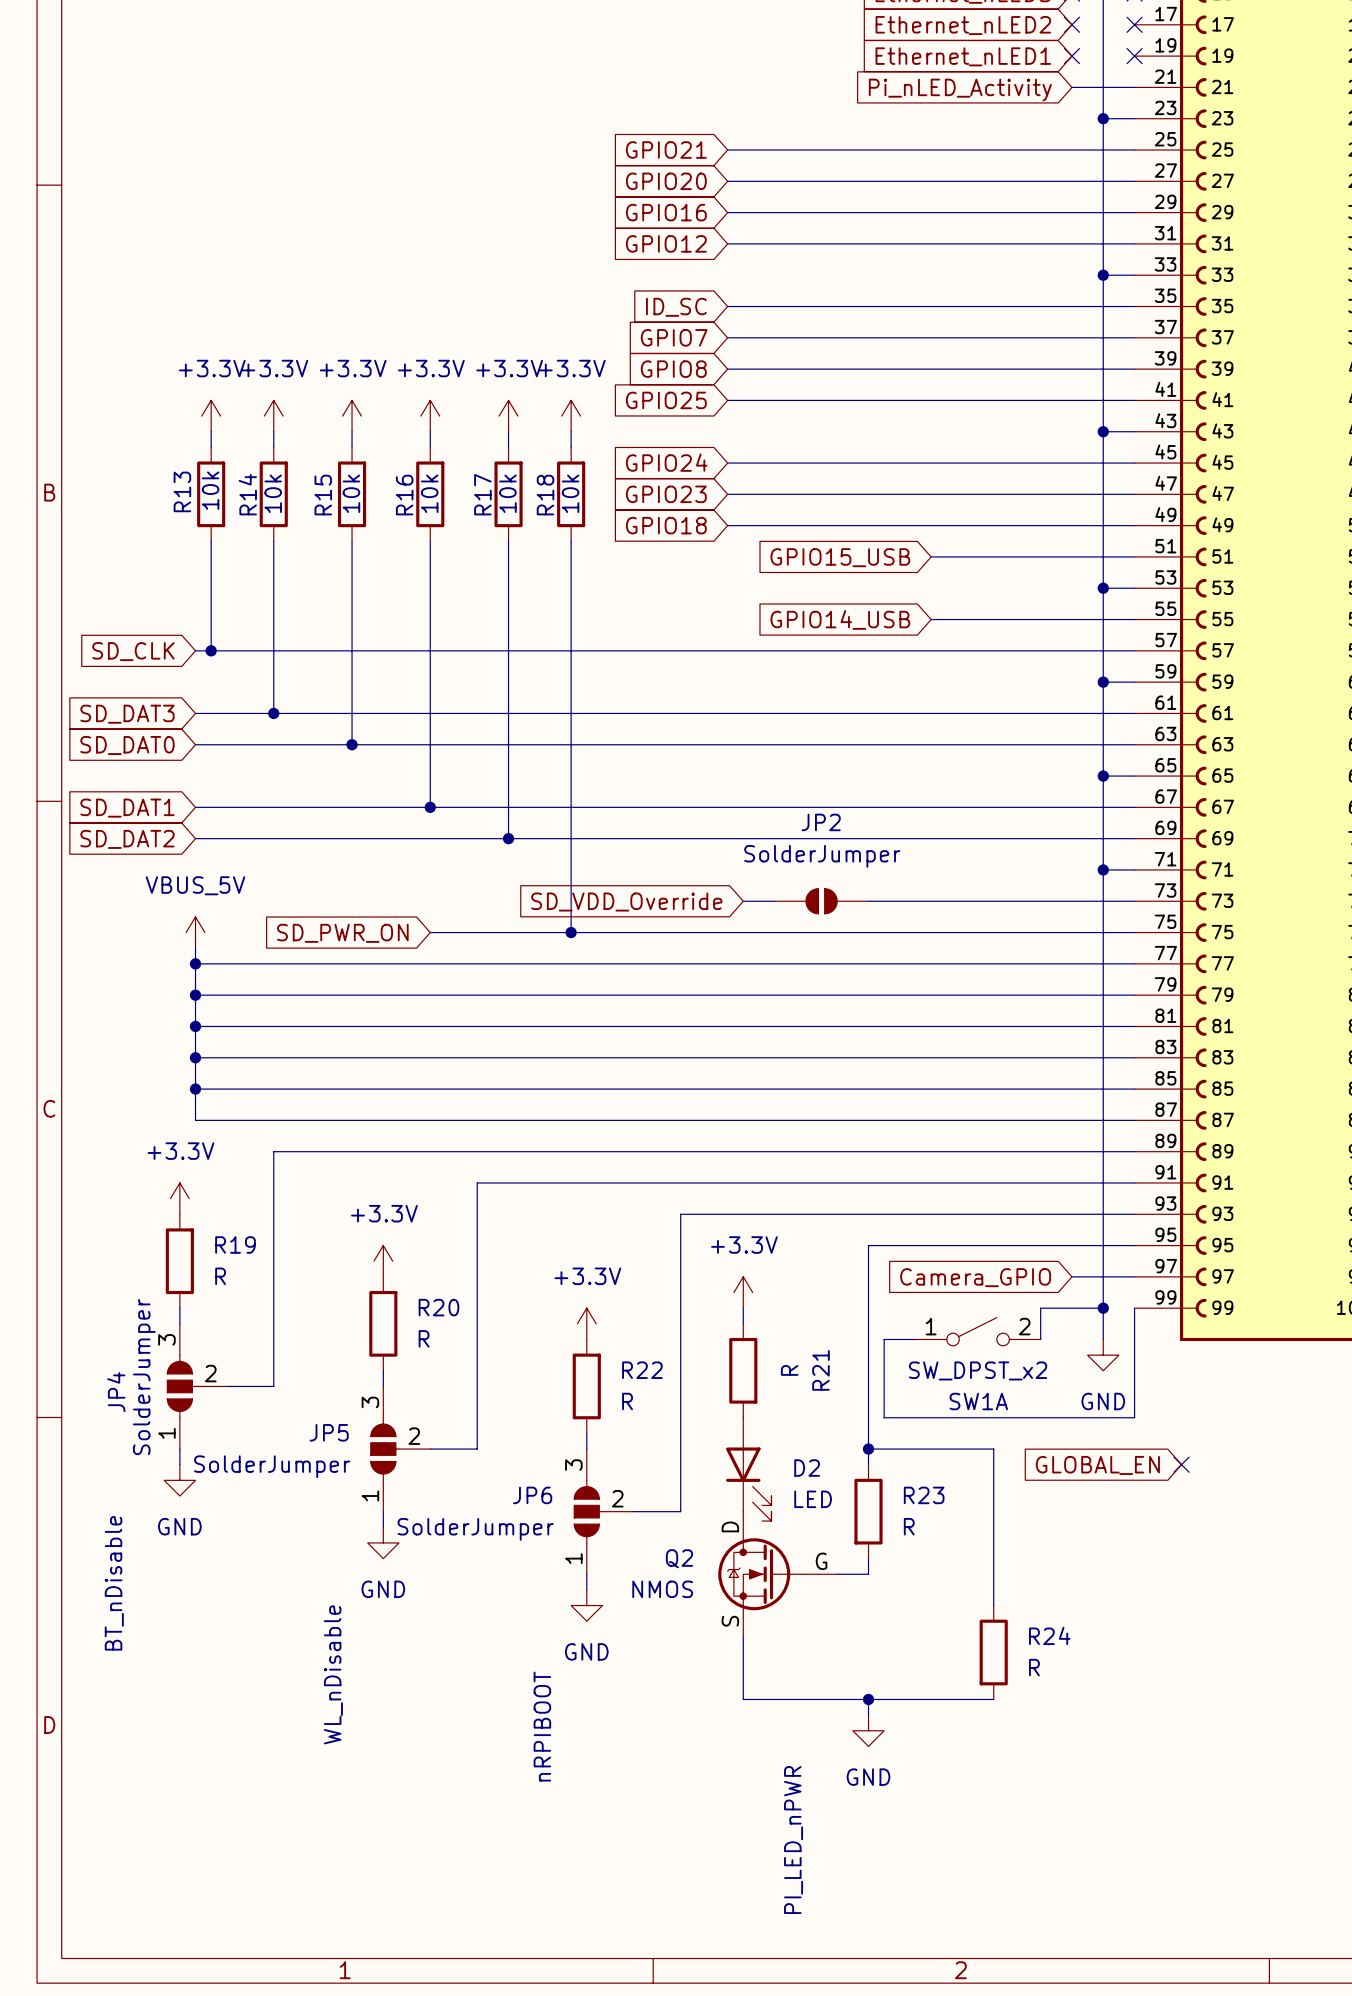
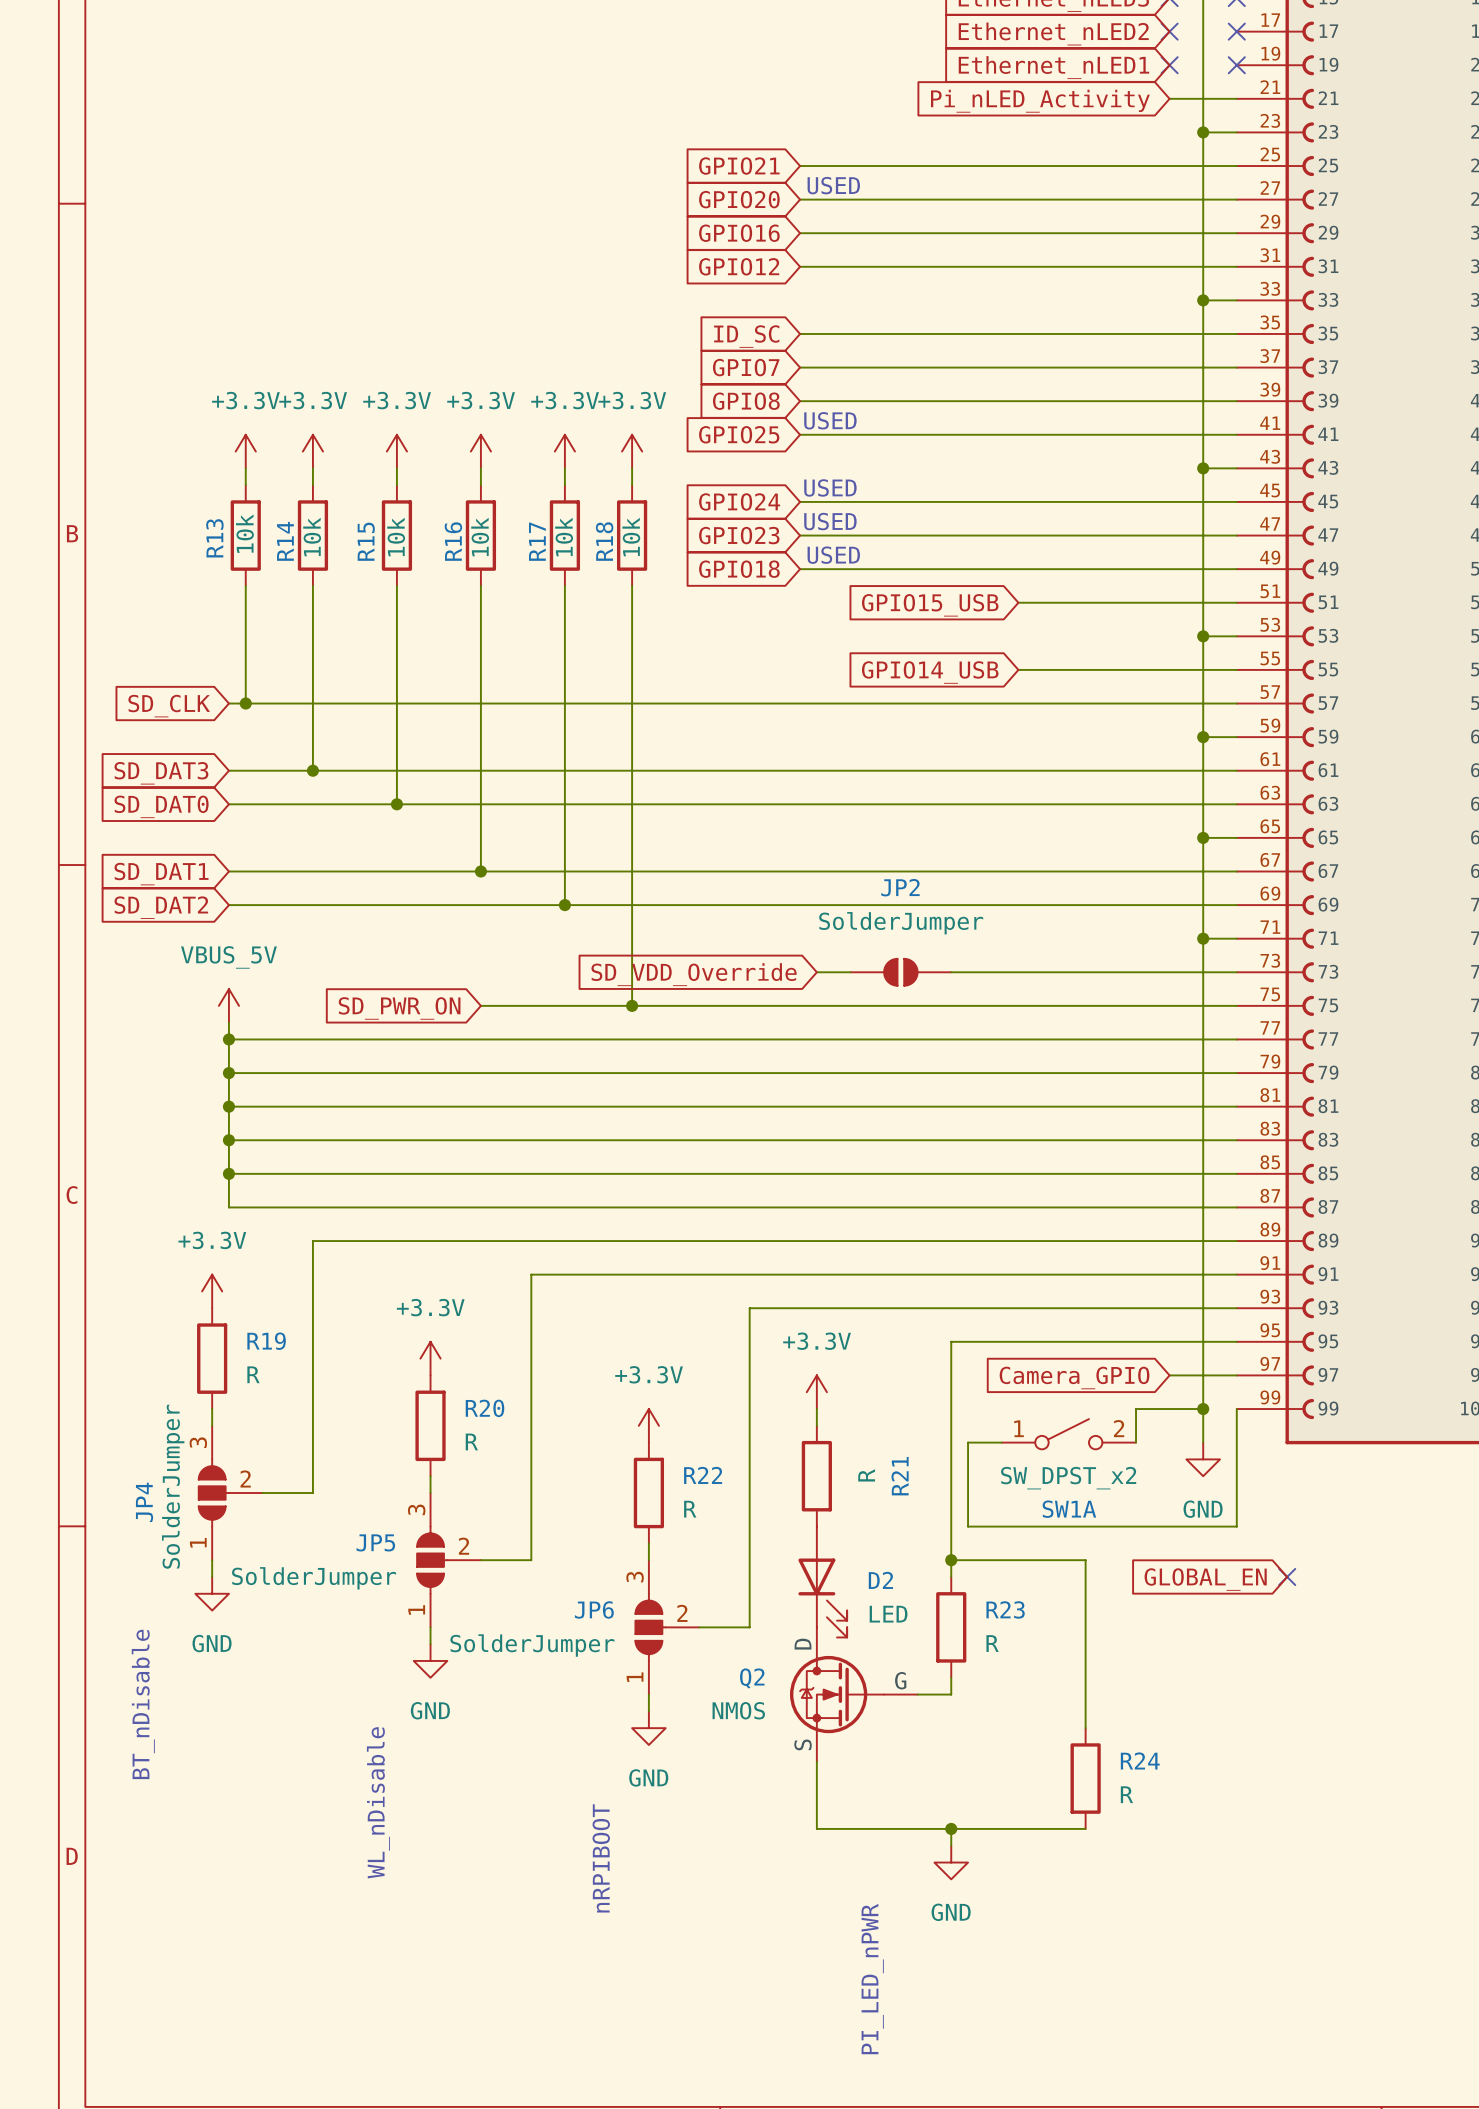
text: none -> USED (833, 185)
text: none -> USED (830, 420)
text: none -> USED (830, 487)
text: none -> USED (830, 521)
text: none -> USED (833, 555)

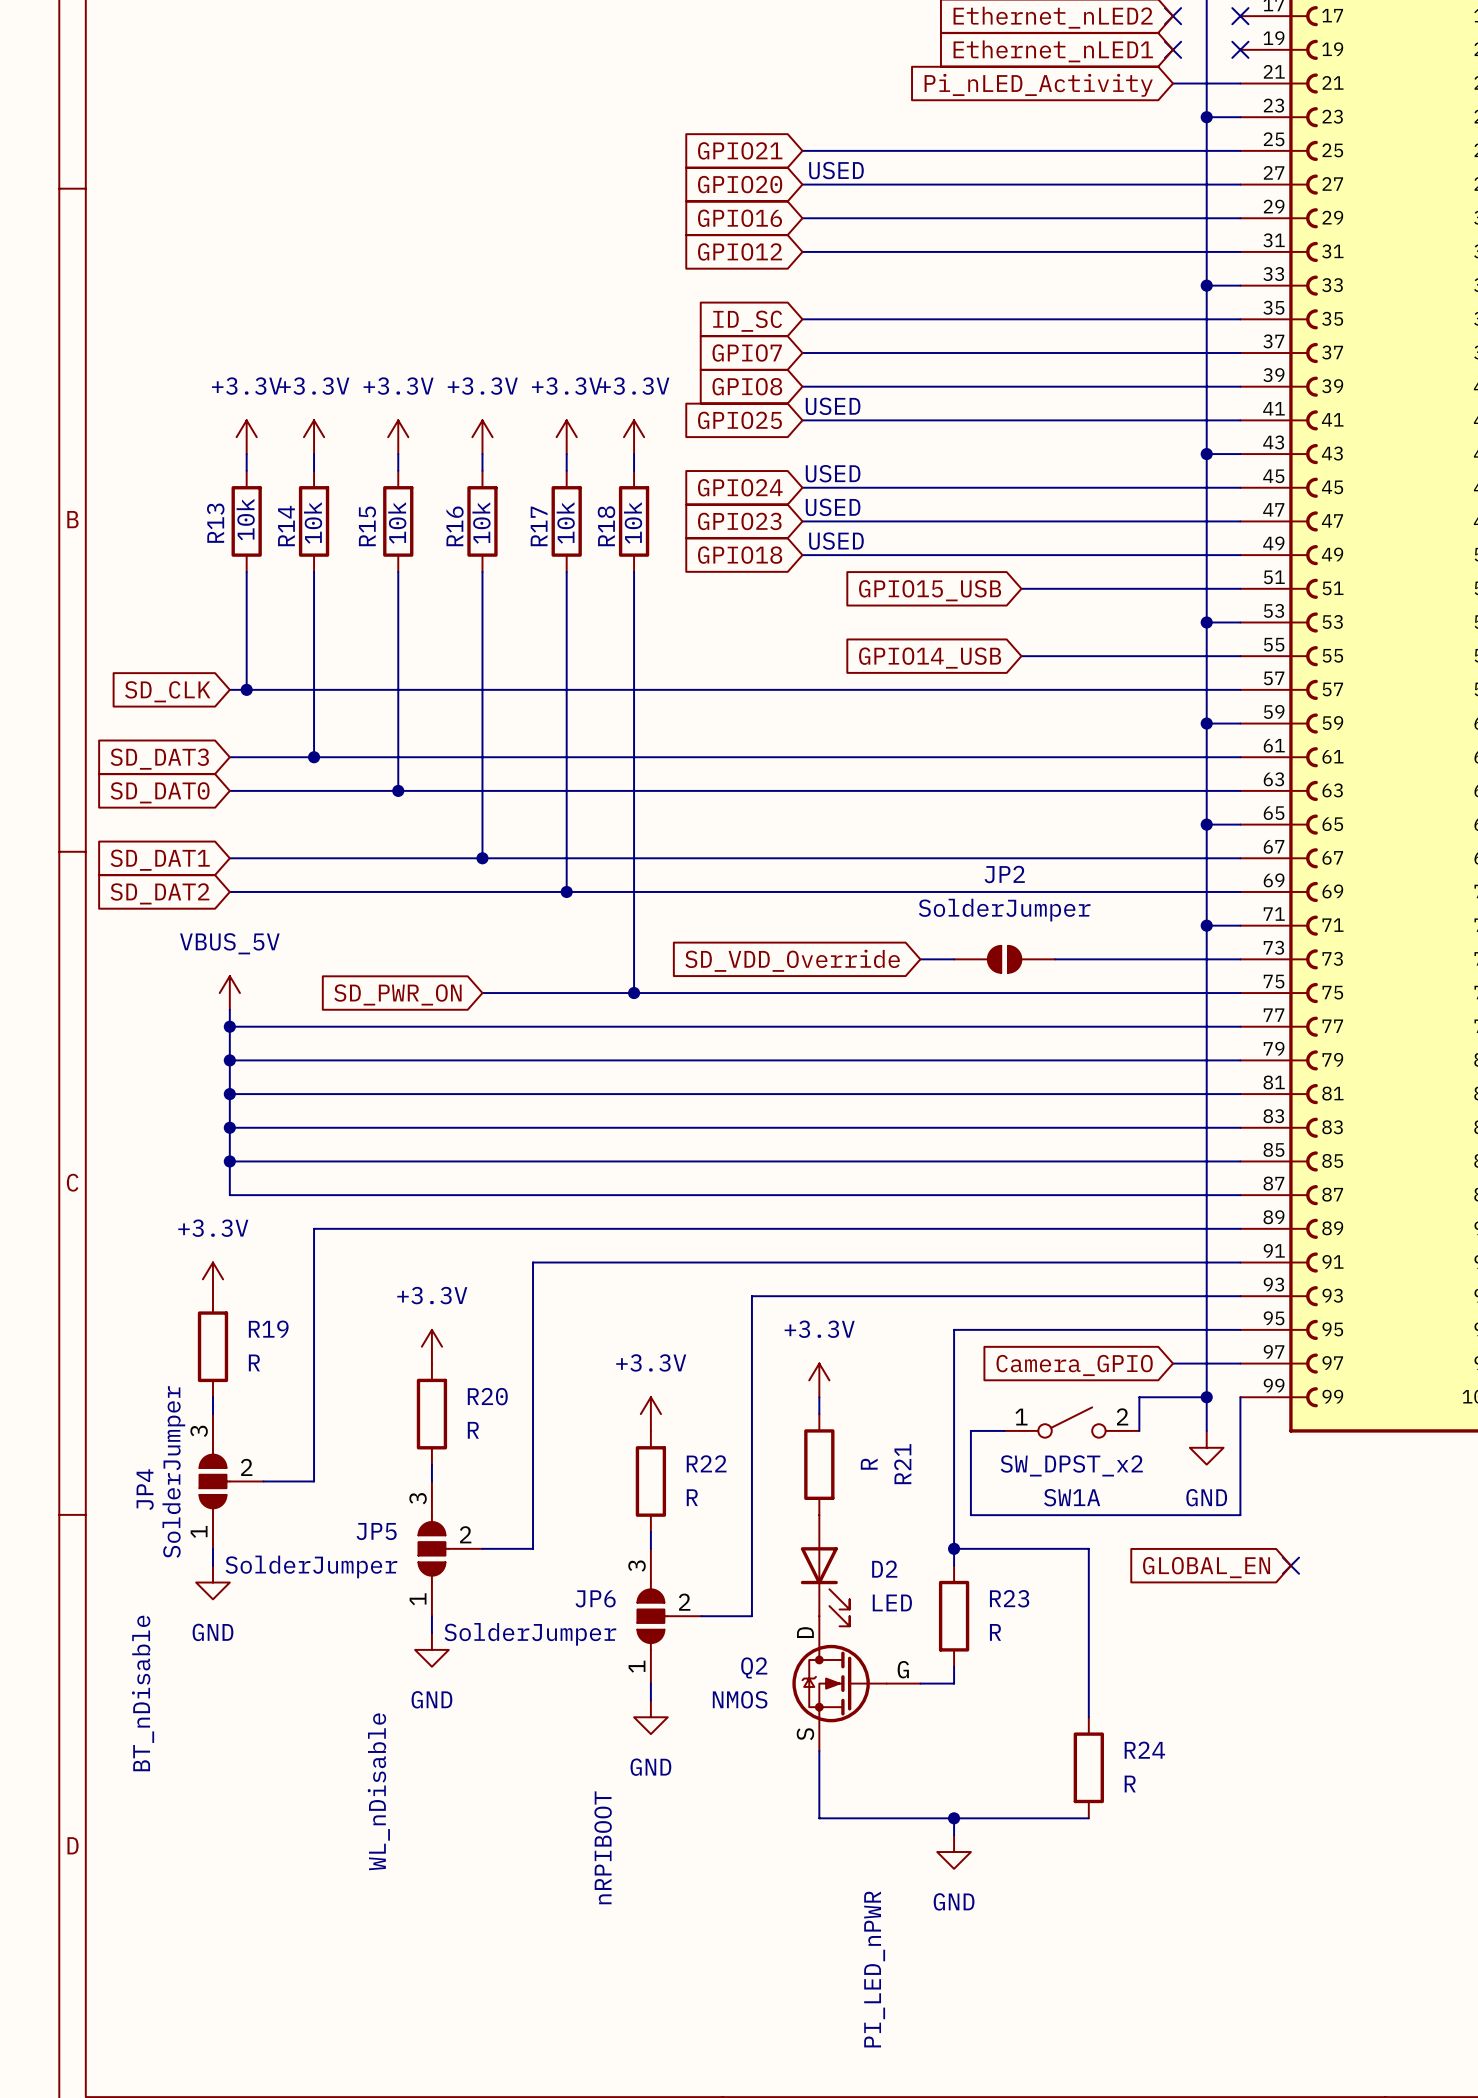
wire: (816, 972) (850, 972) -> none
JP2 position: (900, 972) -> (1004, 959)
global label position: SD_VDD_Override (694, 974) -> SD_VDD_Override (792, 960)

